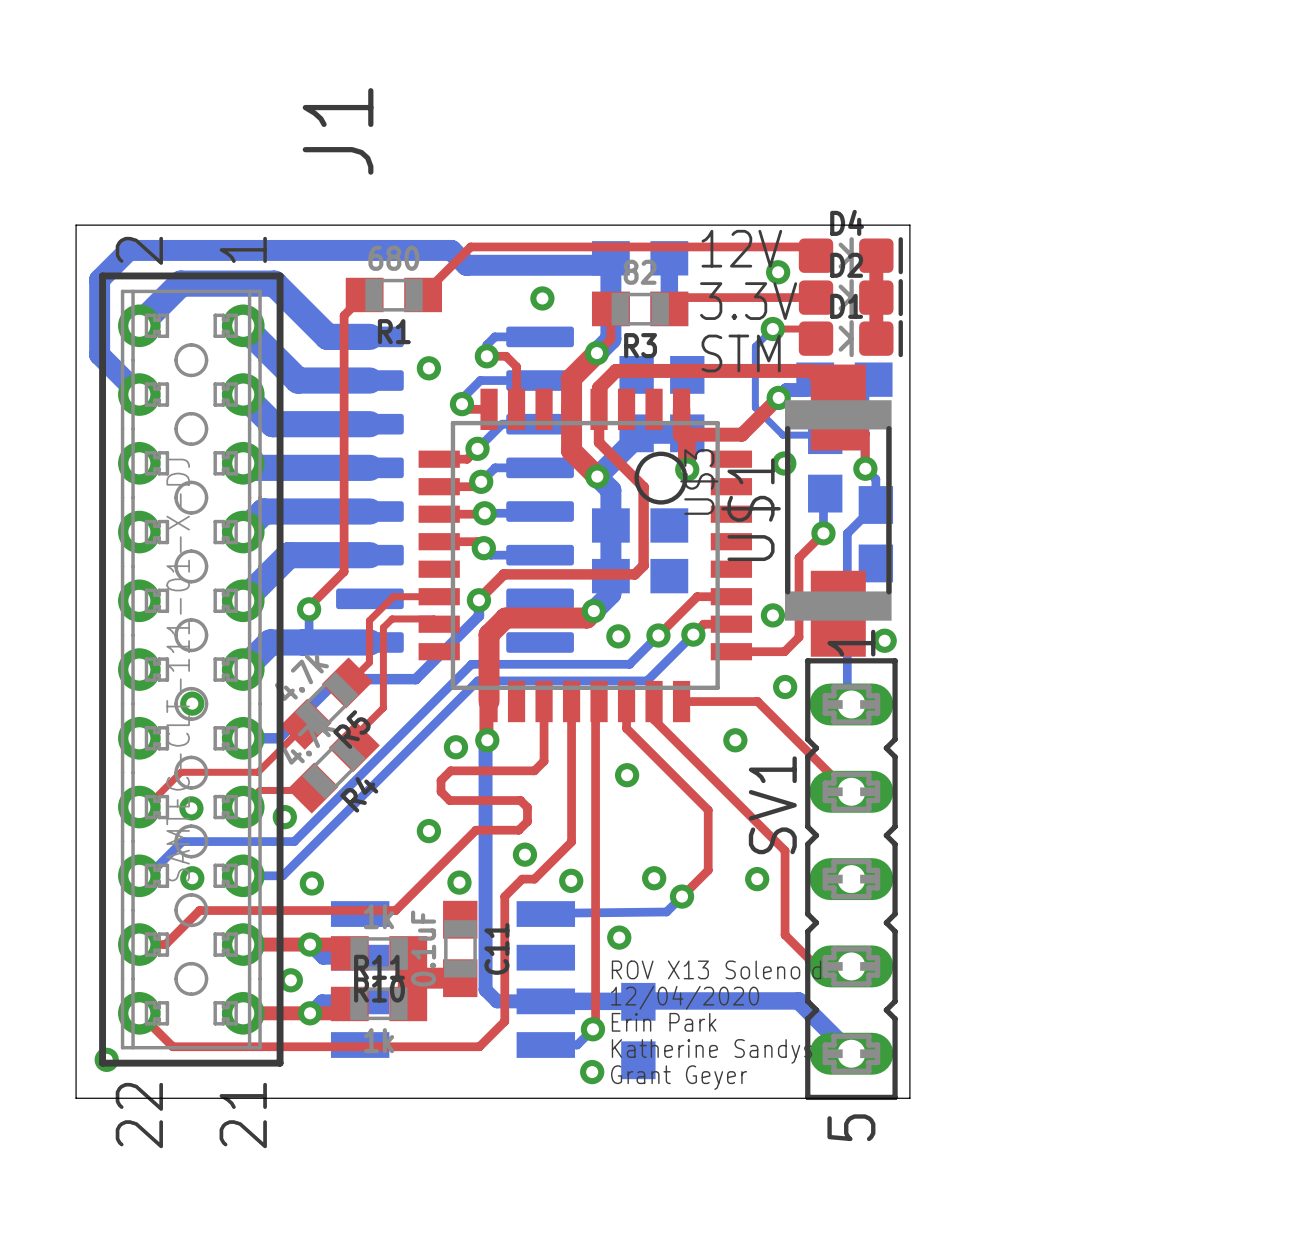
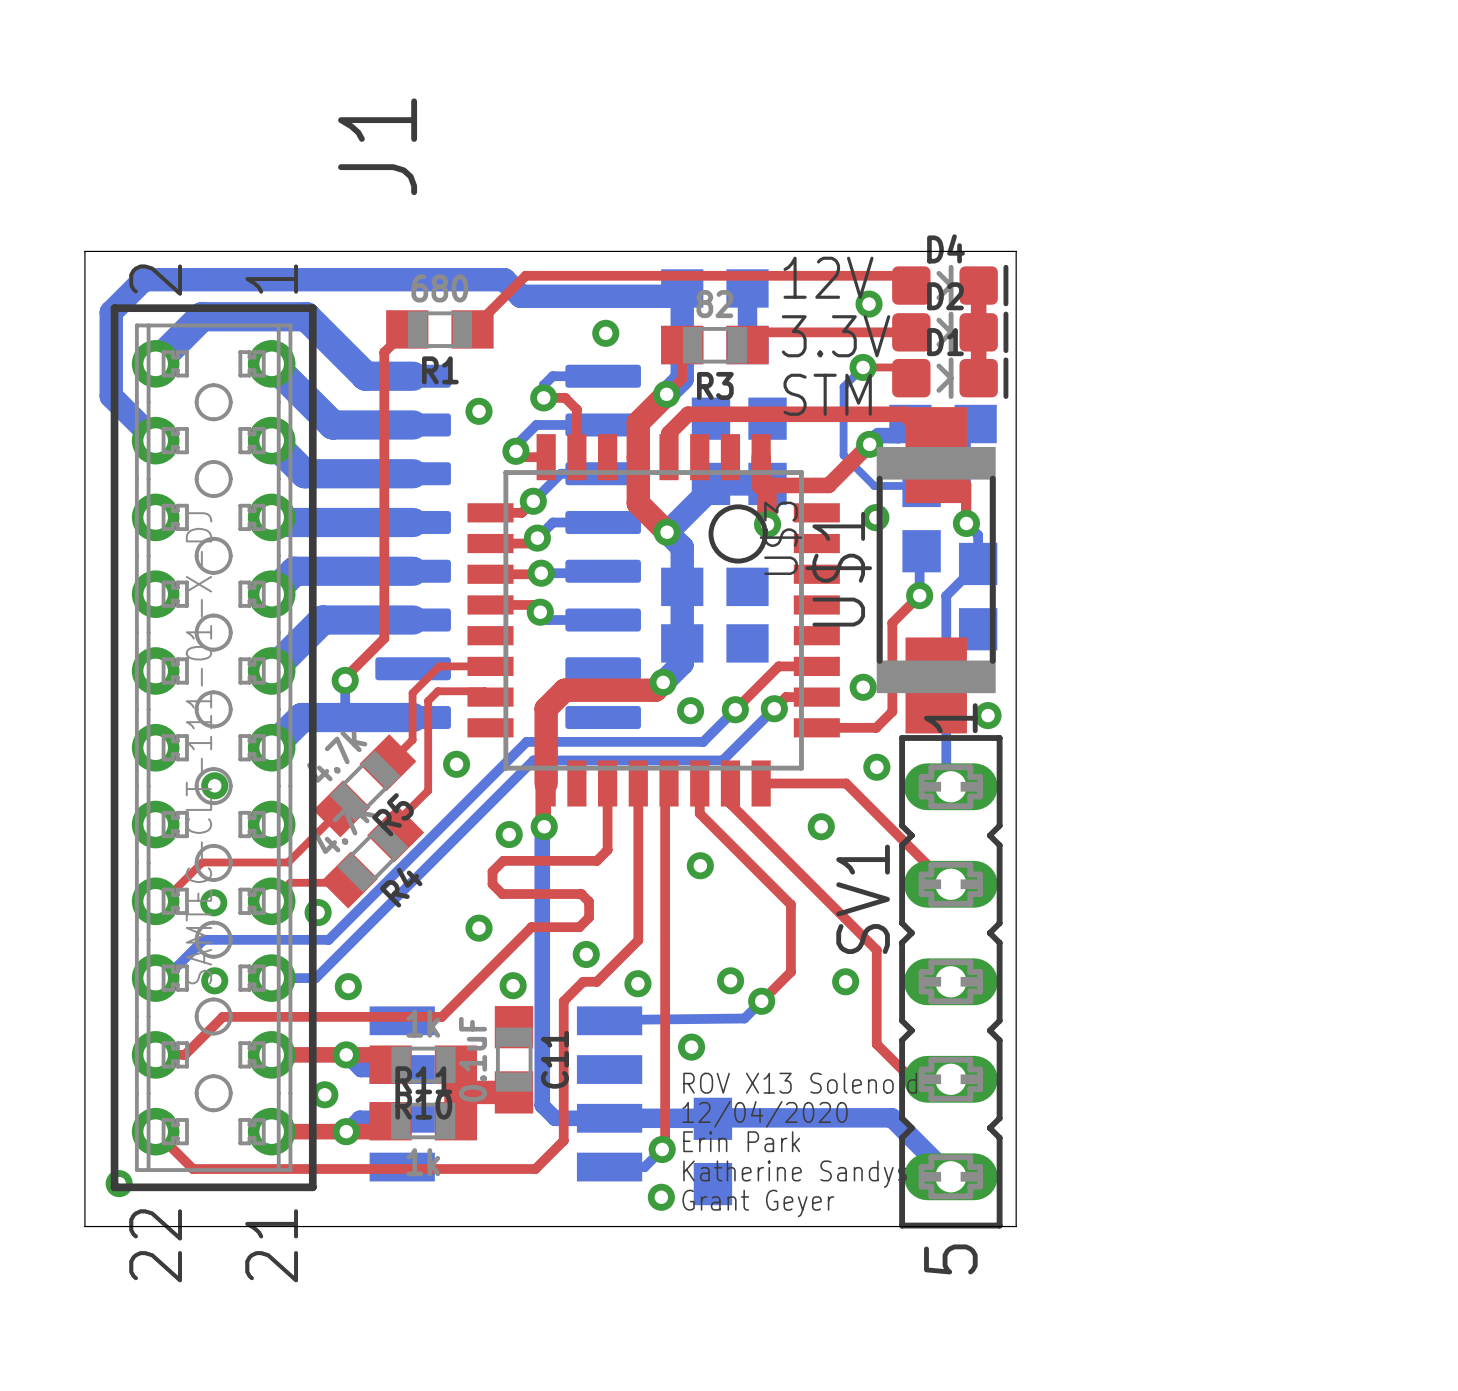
top track: (599, 409) (599, 442) (643, 487) (643, 565) (634, 574) (503, 574) (478, 600) -> none
bottom track: (478, 600) (478, 615) (415, 679) (338, 679) (278, 738) (243, 738) -> none
via position: (478, 600) -> (456, 764)

